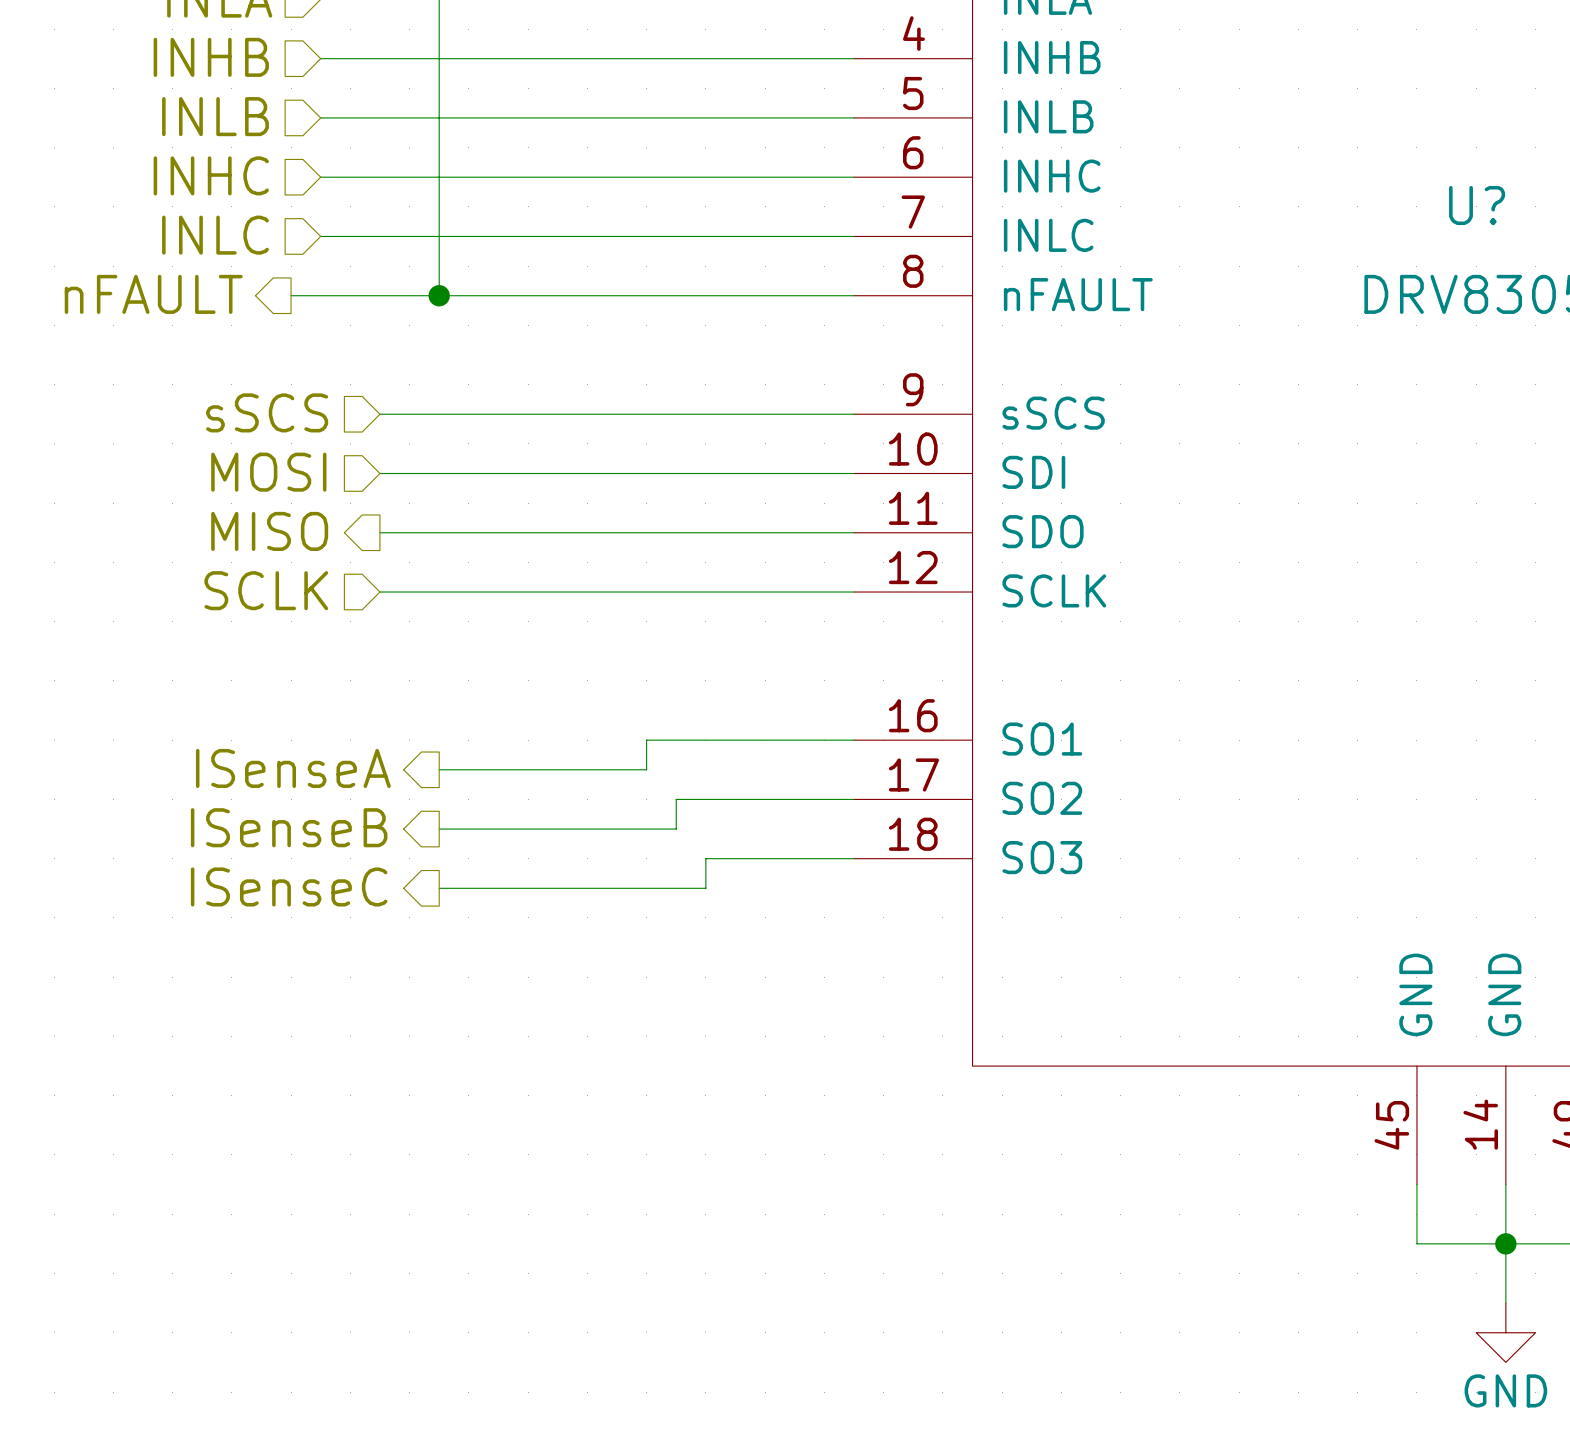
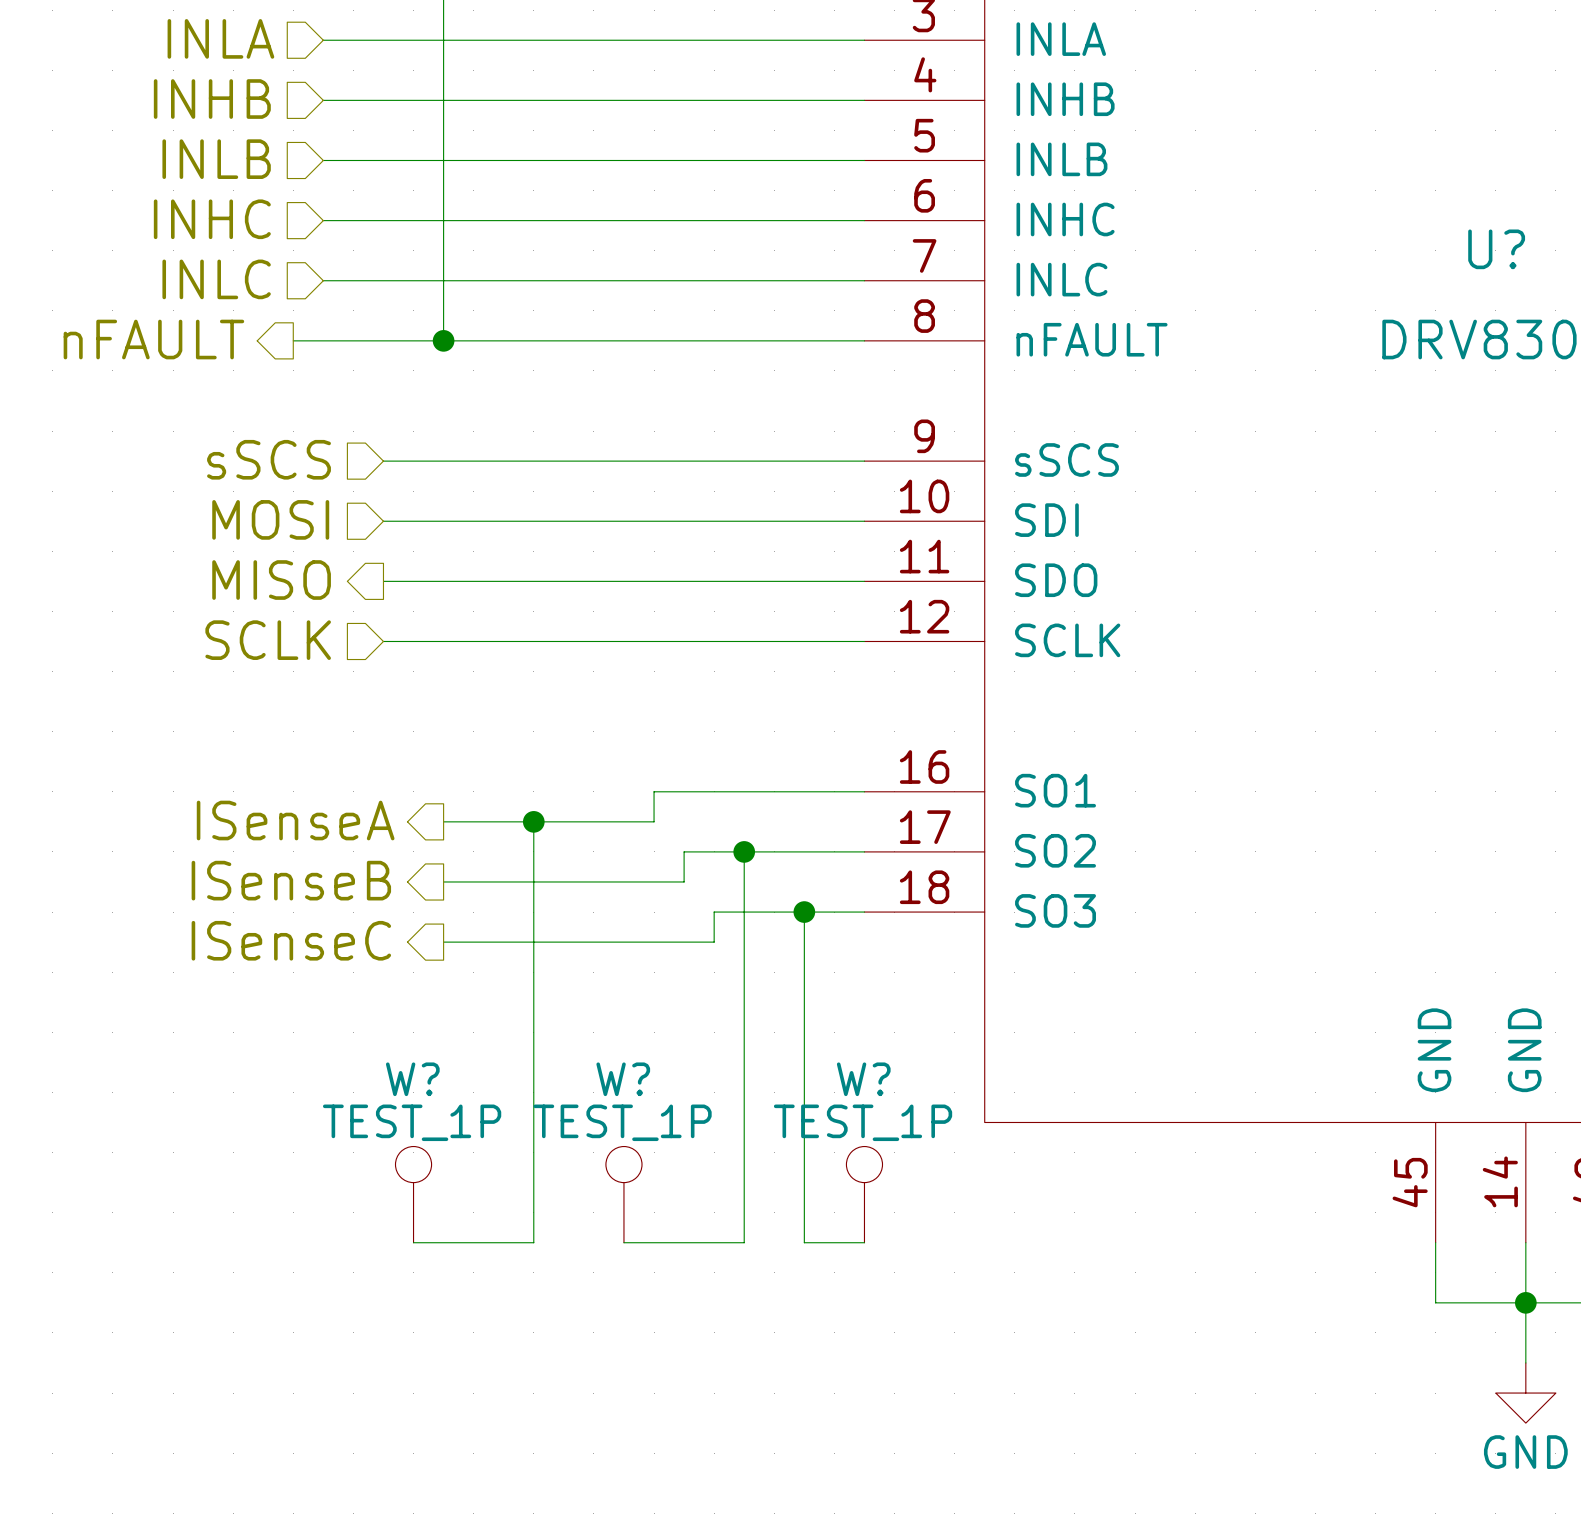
wire: none -> (533, 821) (533, 1242) (413, 1242)
junction: none -> (533, 821)
wire: none -> (744, 851) (744, 1242) (623, 1242)
junction: none -> (744, 851)
wire: none -> (804, 912) (804, 1242) (864, 1242)
junction: none -> (804, 912)
W?: none -> TEST_1P (413, 1194)
W?: none -> TEST_1P (623, 1194)
W?: none -> TEST_1P (864, 1194)

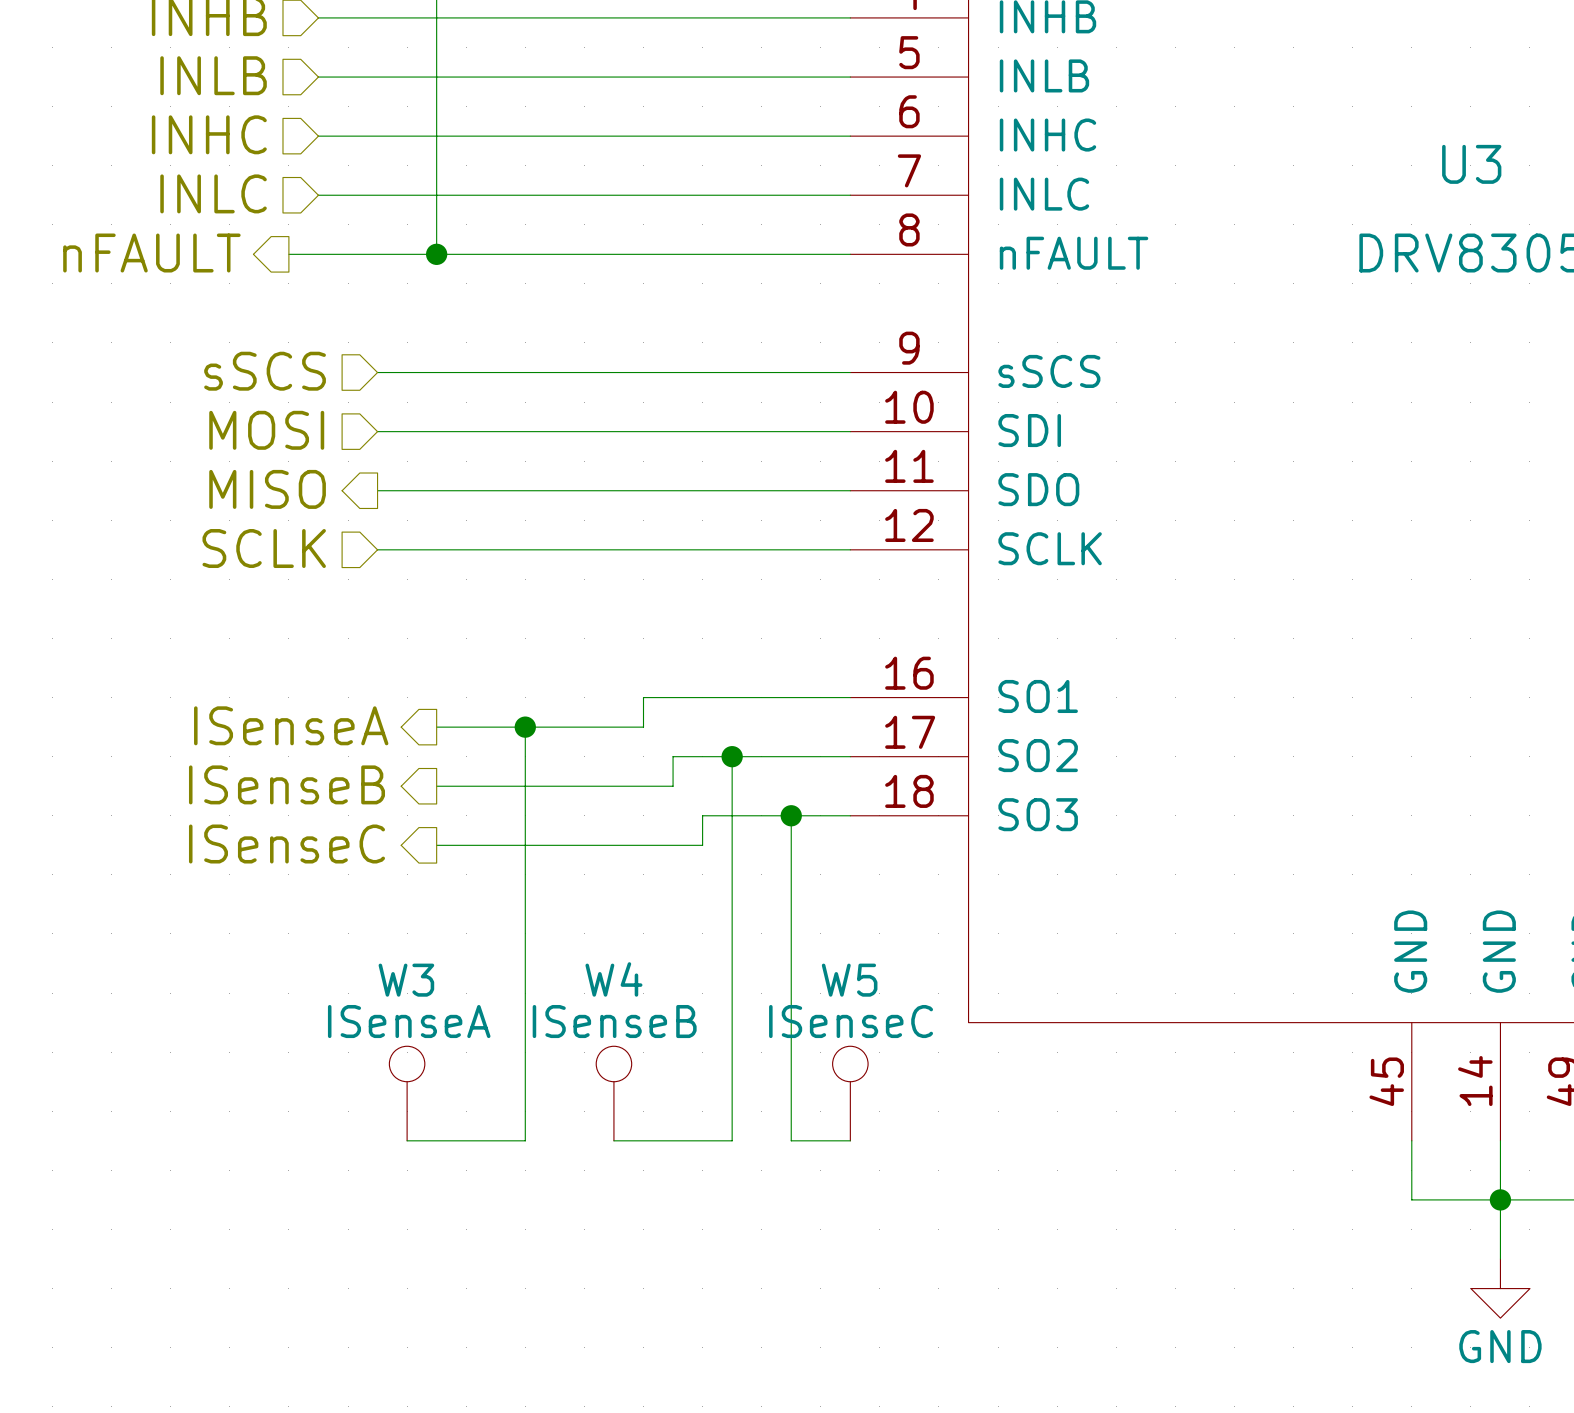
U? name: U? (1496, 249) -> U3 (1471, 164)
W? name: W? (412, 1079) -> W3 (406, 980)
W? name: W? (623, 1079) -> W4 (613, 979)
W? name: W? (863, 1079) -> W5 (849, 980)
W? value: TEST_1P (412, 1122) -> ISenseA (409, 1021)
W? value: TEST_1P (622, 1122) -> ISenseB (614, 1021)
W? value: TEST_1P (863, 1122) -> ISenseC (851, 1021)

